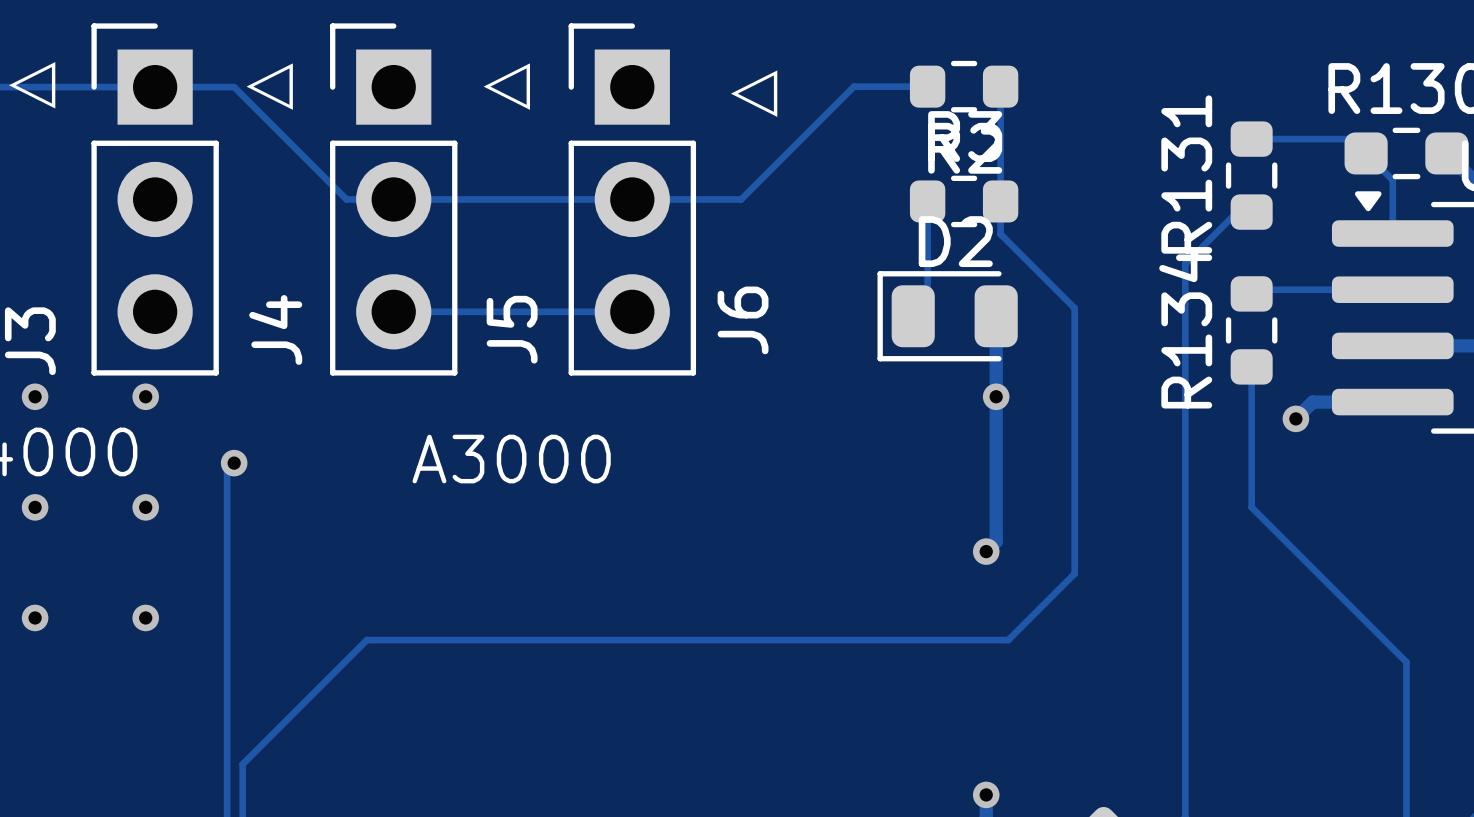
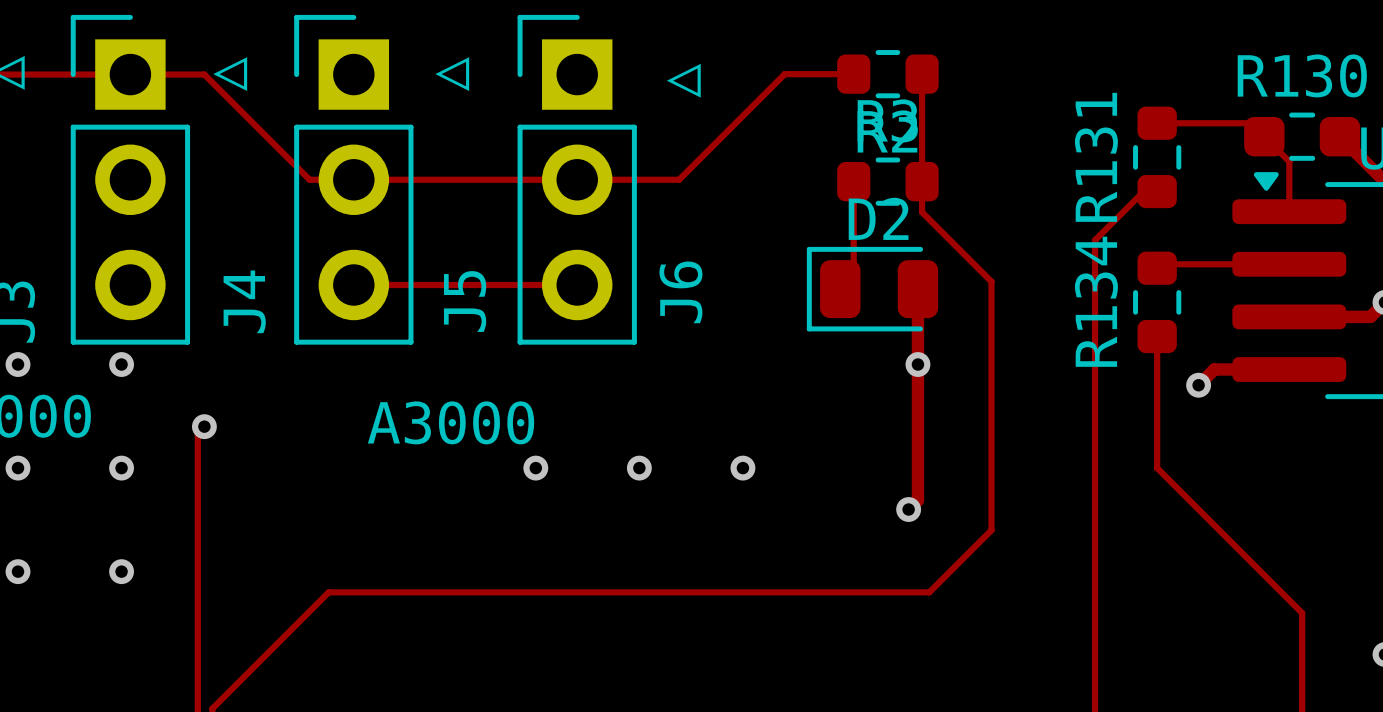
via: none -> (535, 468)
via: none -> (639, 468)
via: none -> (742, 468)

